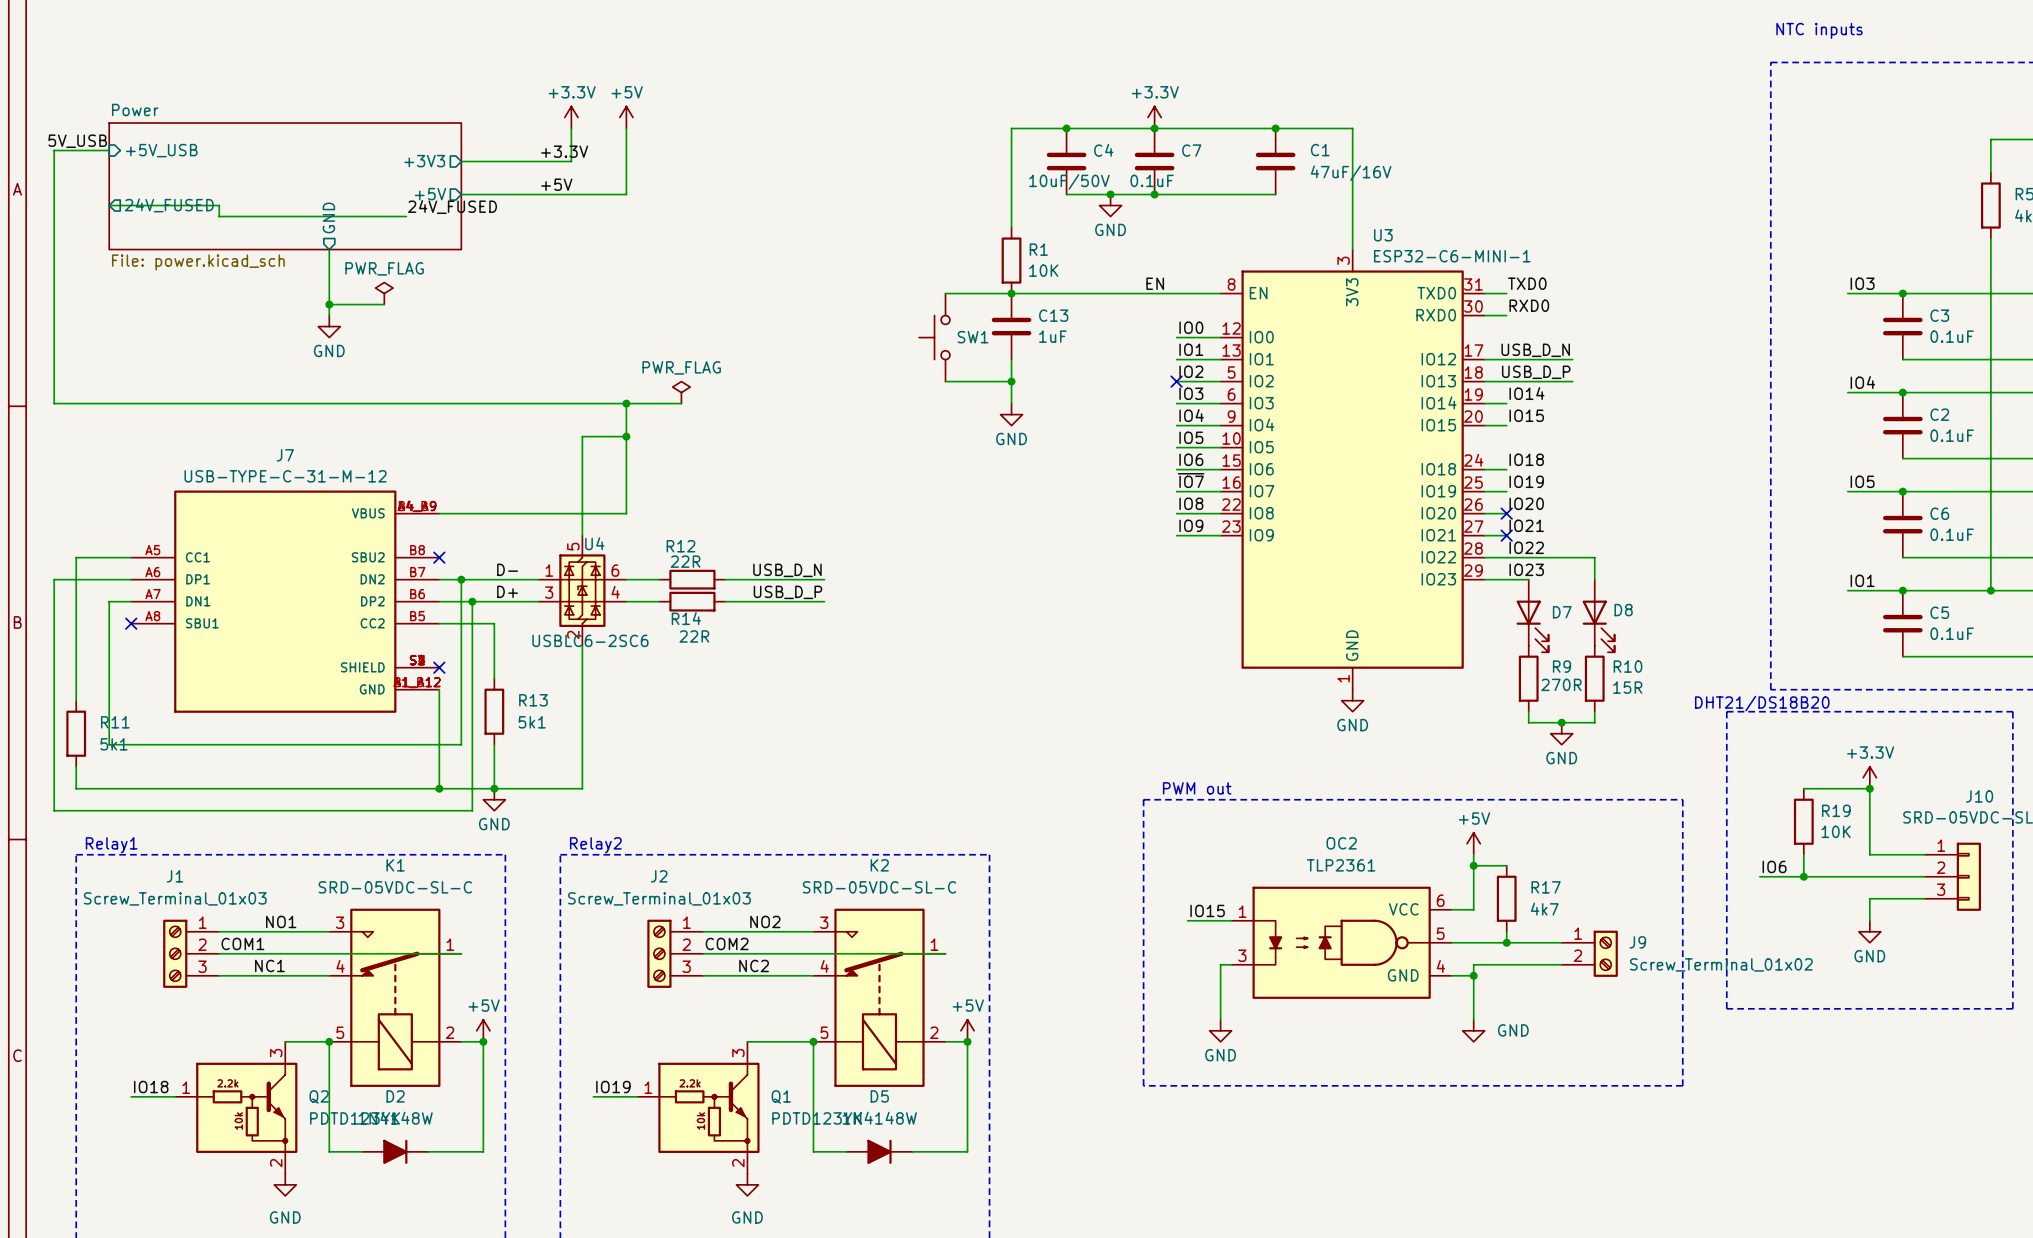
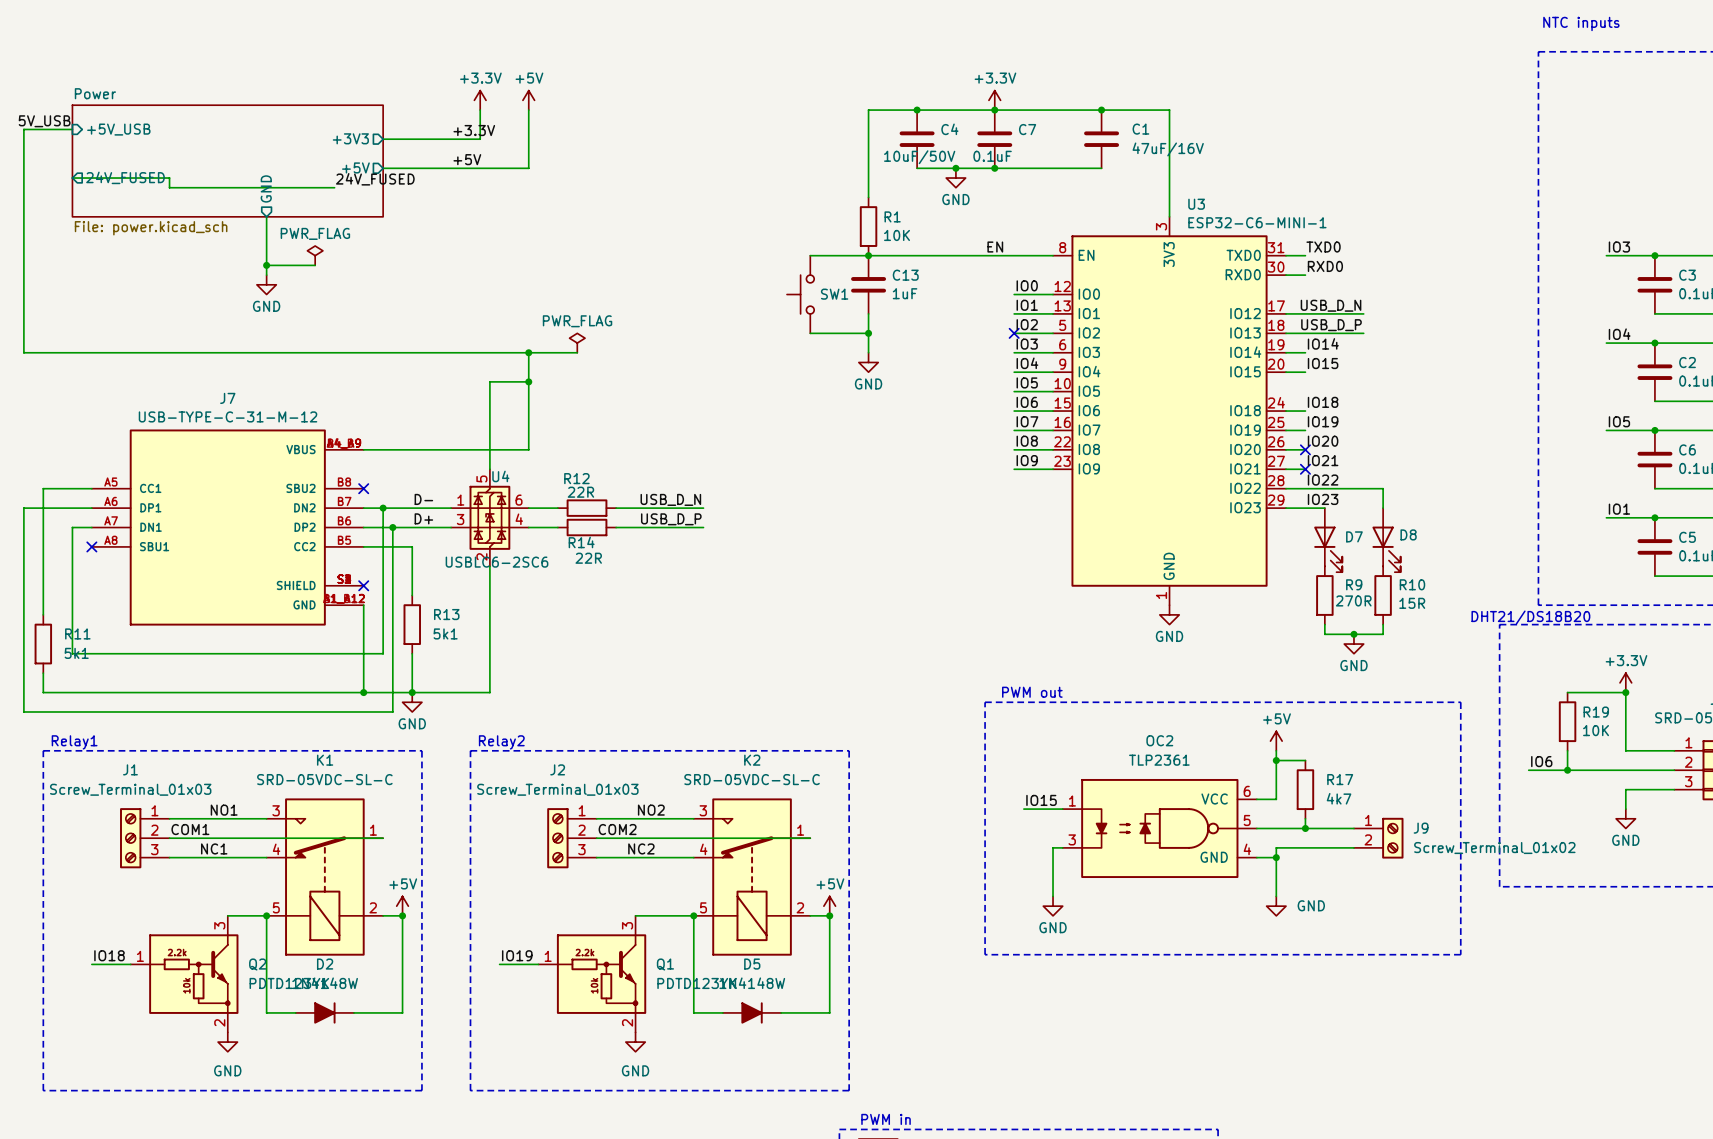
label: ~{IO7} (1191, 480) -> IO7 (1027, 421)

